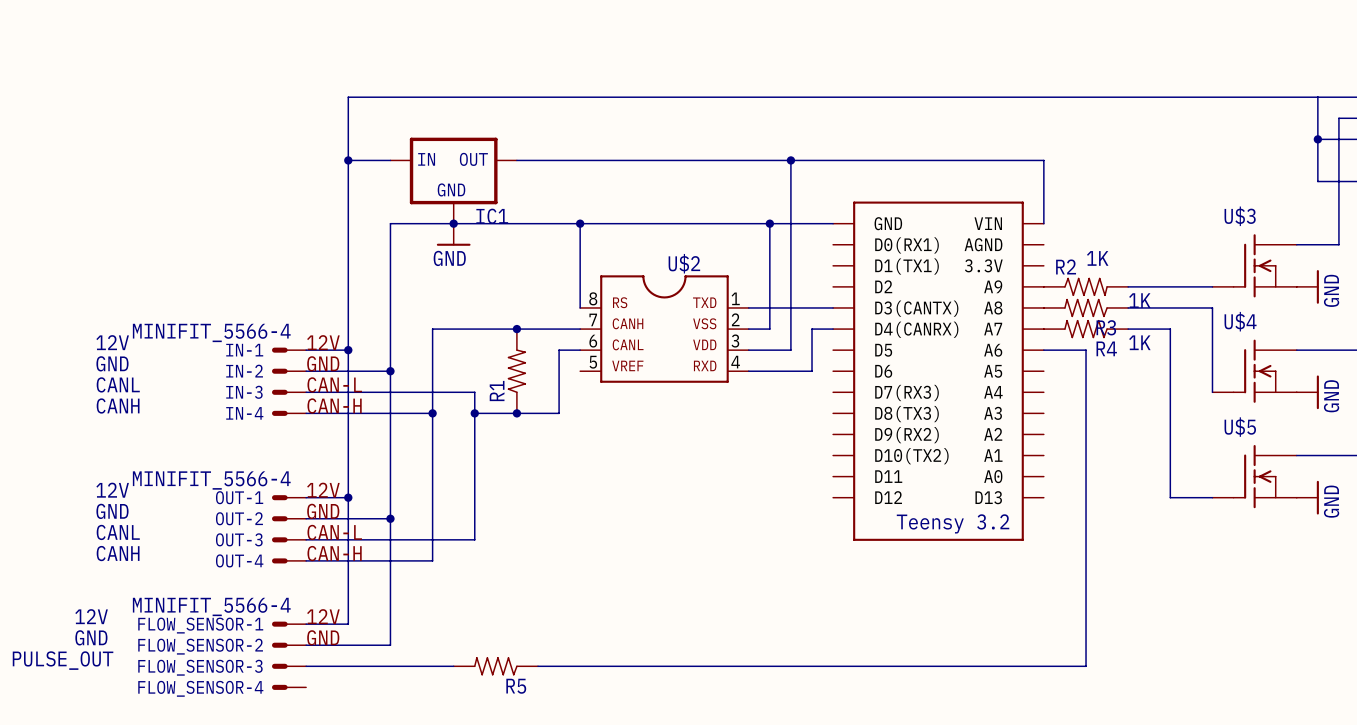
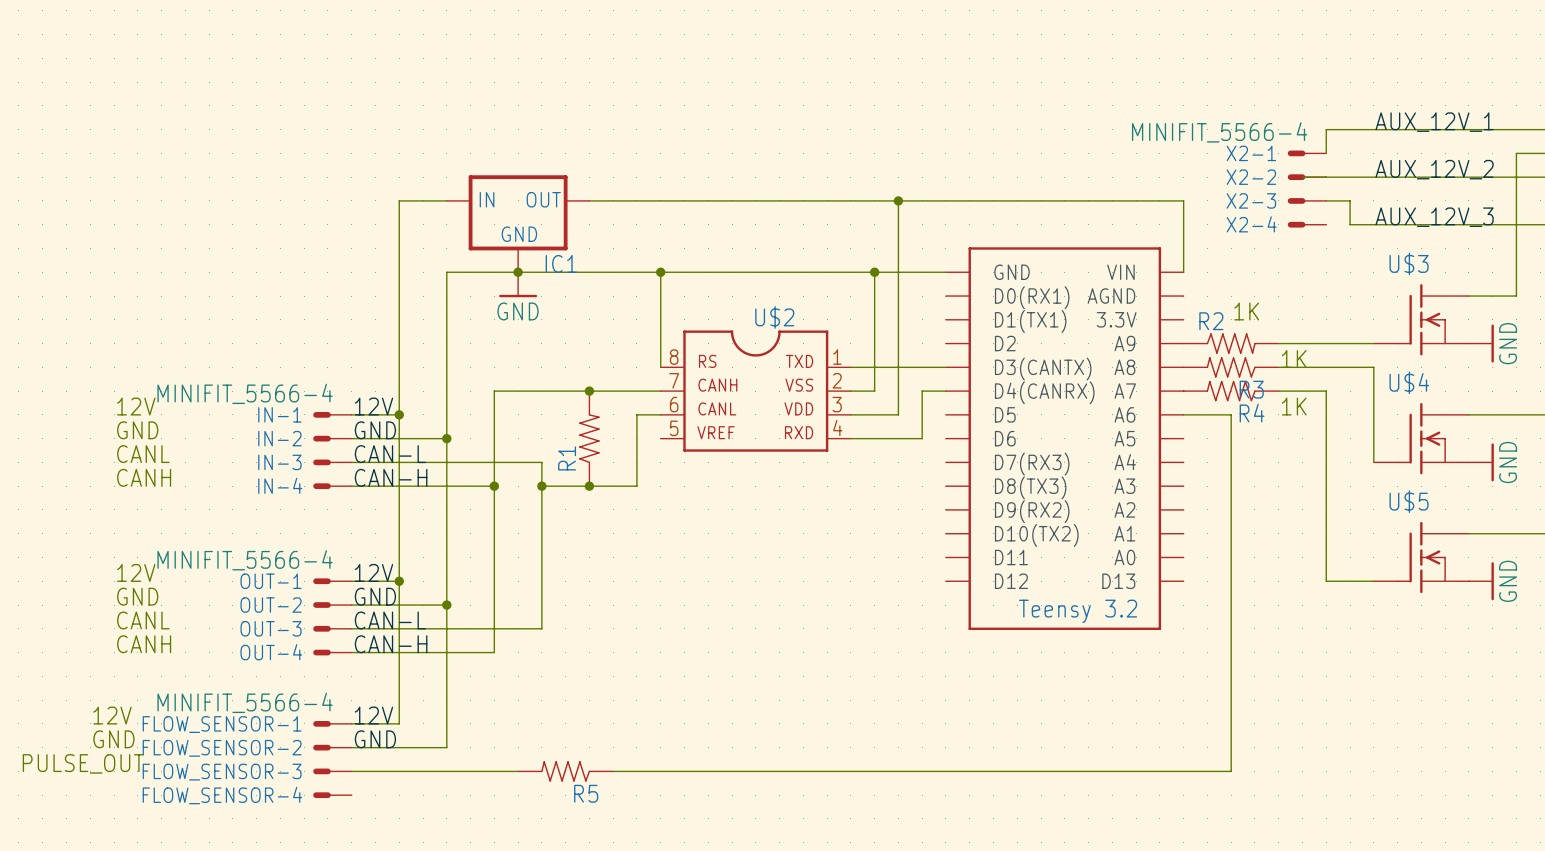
label: none -> AUX_12V_1 (1434, 122)
wire: (1170, 97) (348, 97) (348, 160) -> (1326, 129) (1326, 153)
wire: (1317, 97) (1317, 181) -> (1326, 200) (1350, 200) (1350, 224) (1492, 224)
X2-1: none -> MINIFIT_5566-4 (1307, 153)
label: none -> AUX_12V_2 (1434, 169)
wire: none -> (1302, 177) (1492, 177)
X2-2: none -> (1307, 177)
junction: (1317, 139) -> none
junction: (348, 160) -> none
X2-3: none -> (1307, 200)
label: none -> AUX_12V_3 (1434, 217)
X2-4: none -> (1307, 224)

